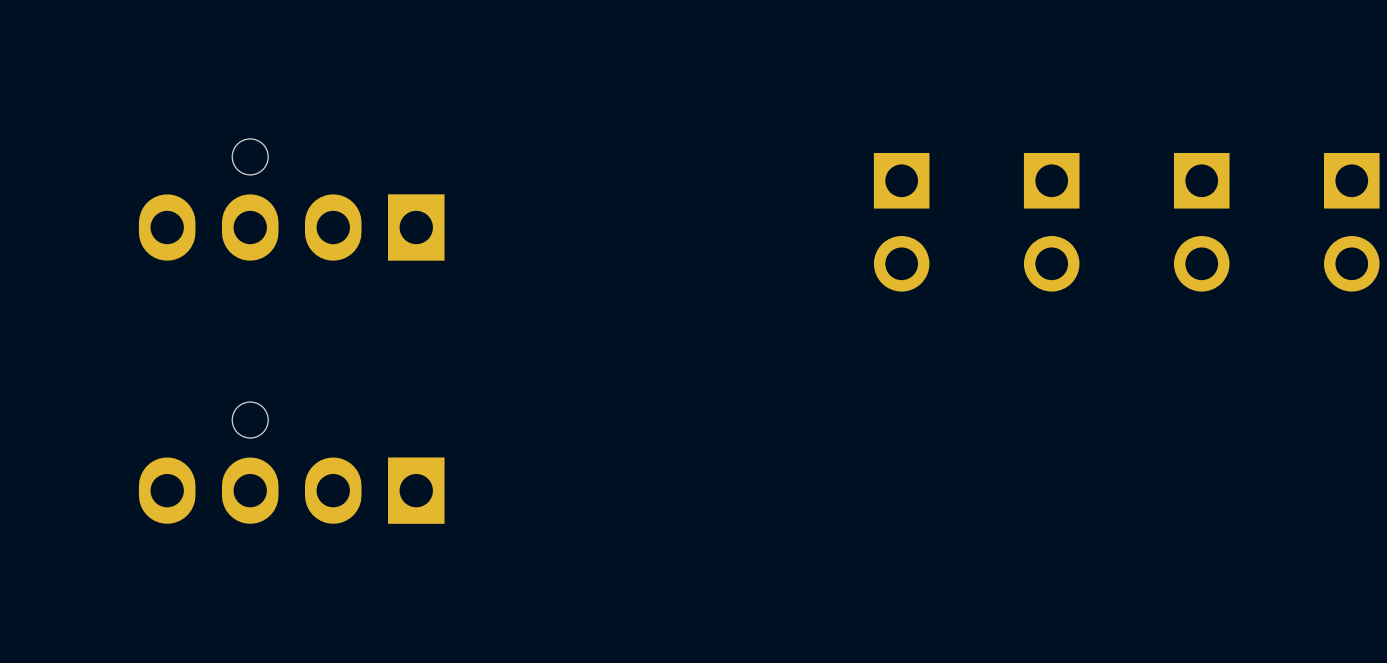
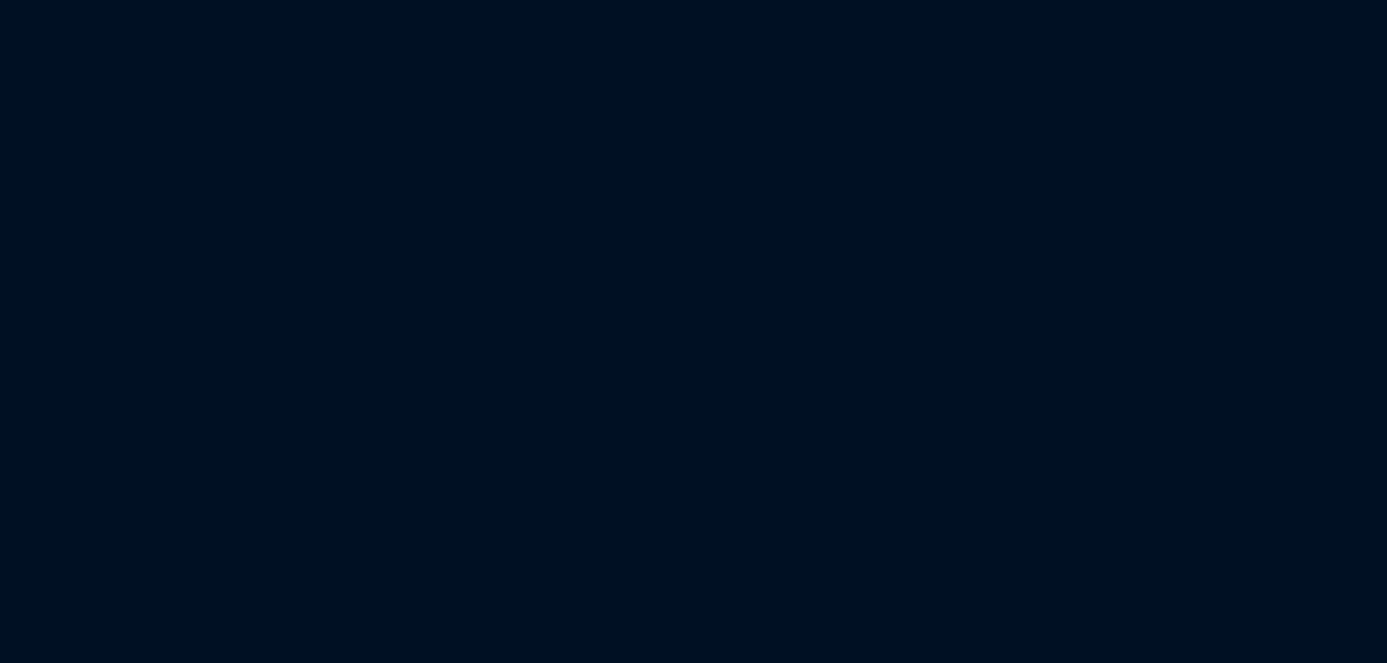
part: (291, 199) -> none
part: (901, 222) -> none
part: (1051, 222) -> none
part: (1201, 222) -> none
part: (1351, 222) -> none
part: (291, 462) -> none

